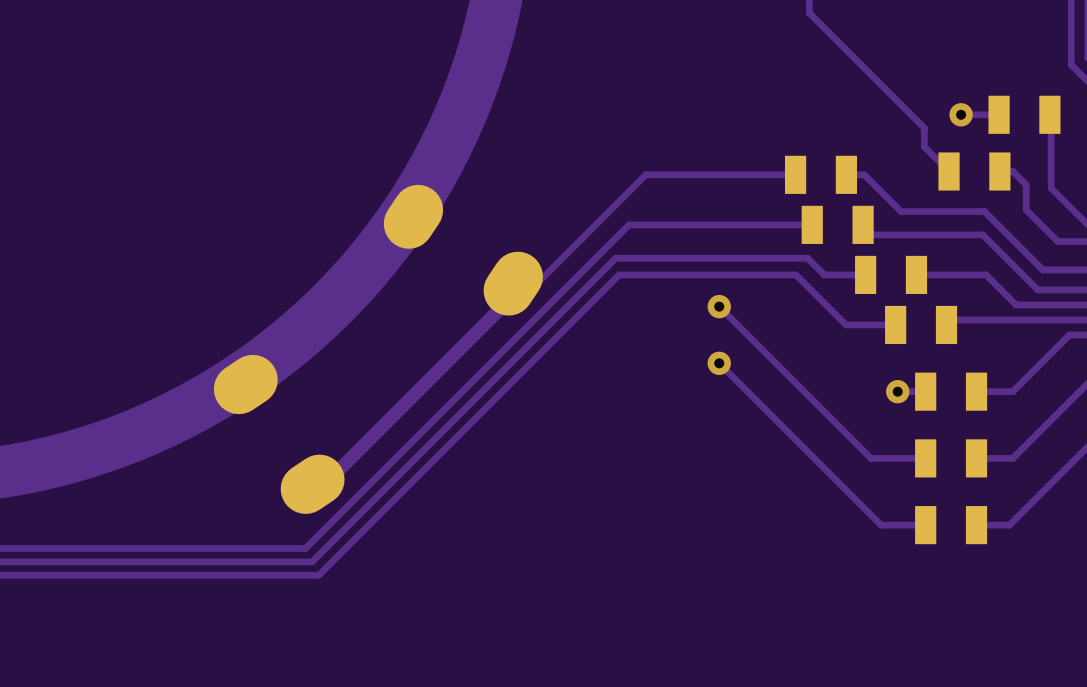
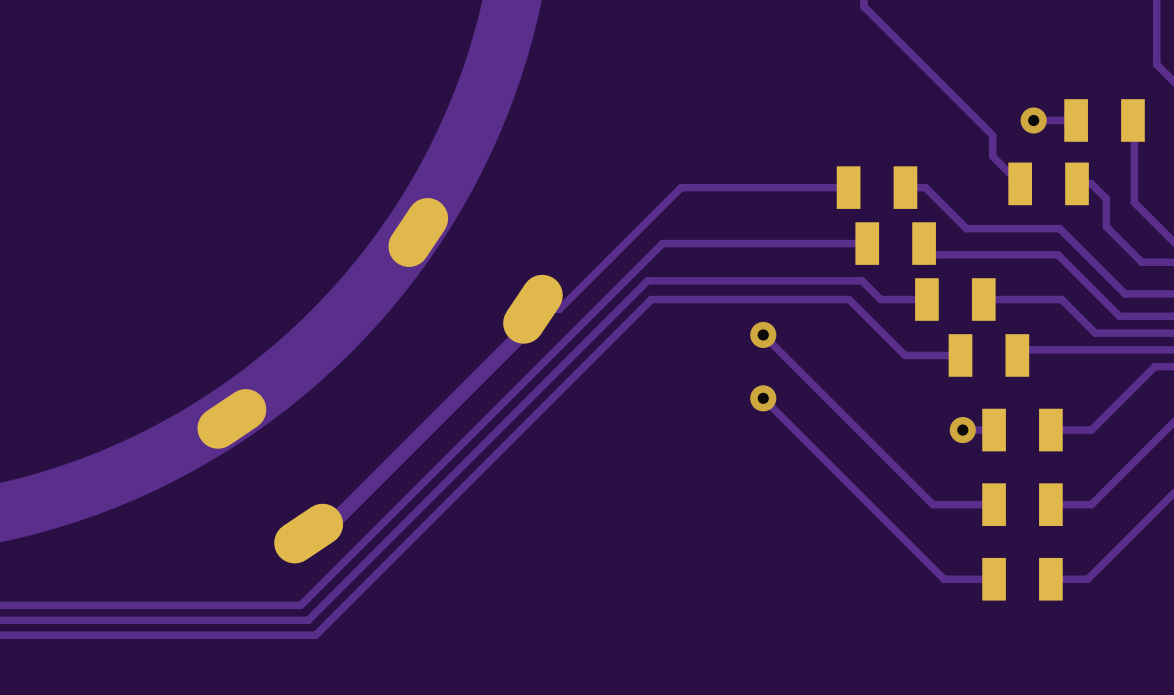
part footprint: [383, 184, 543, 316] -> [388, 198, 563, 344]
part footprint: [213, 354, 345, 514] -> [197, 389, 344, 564]

